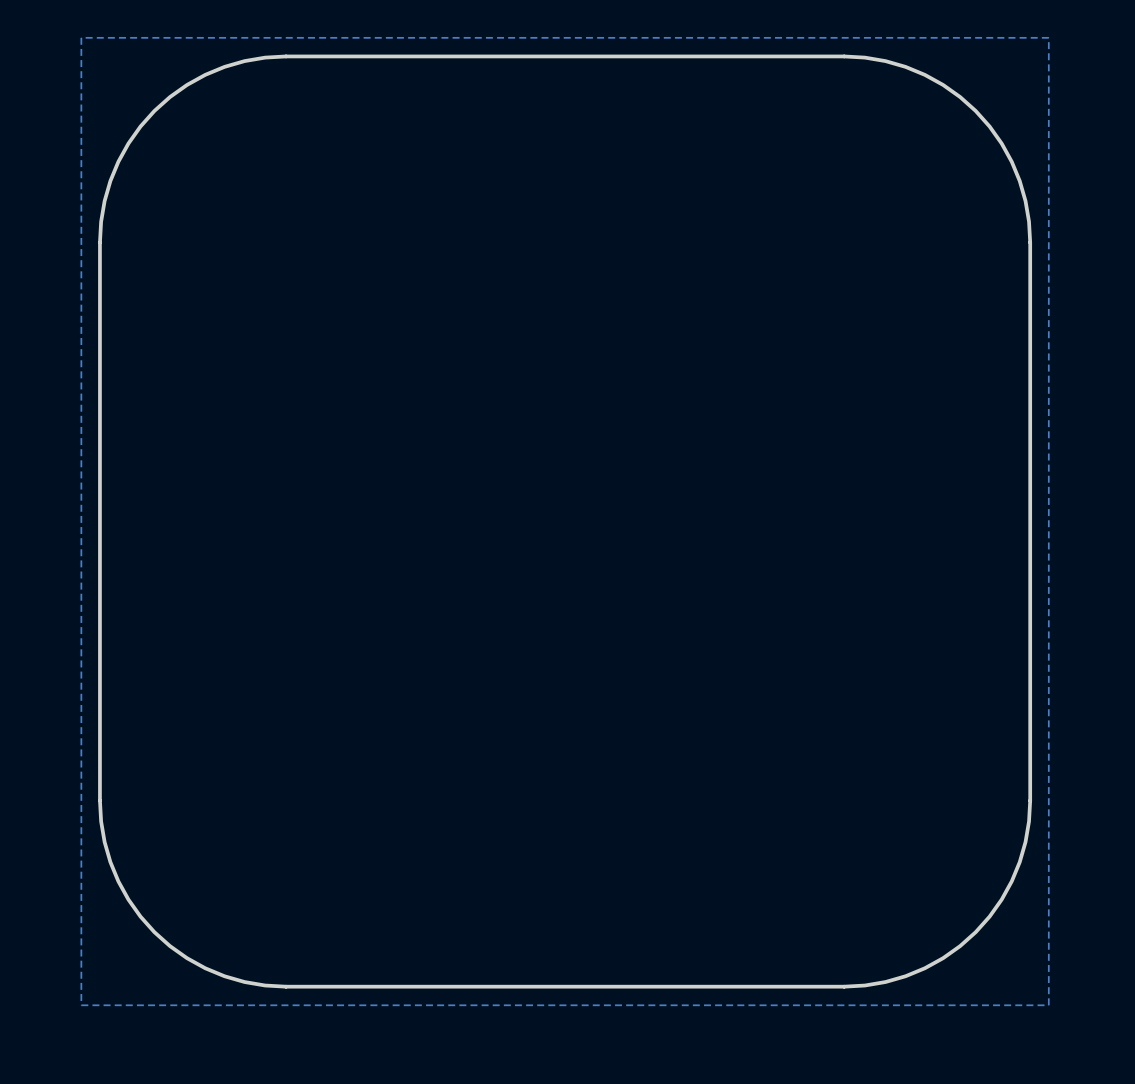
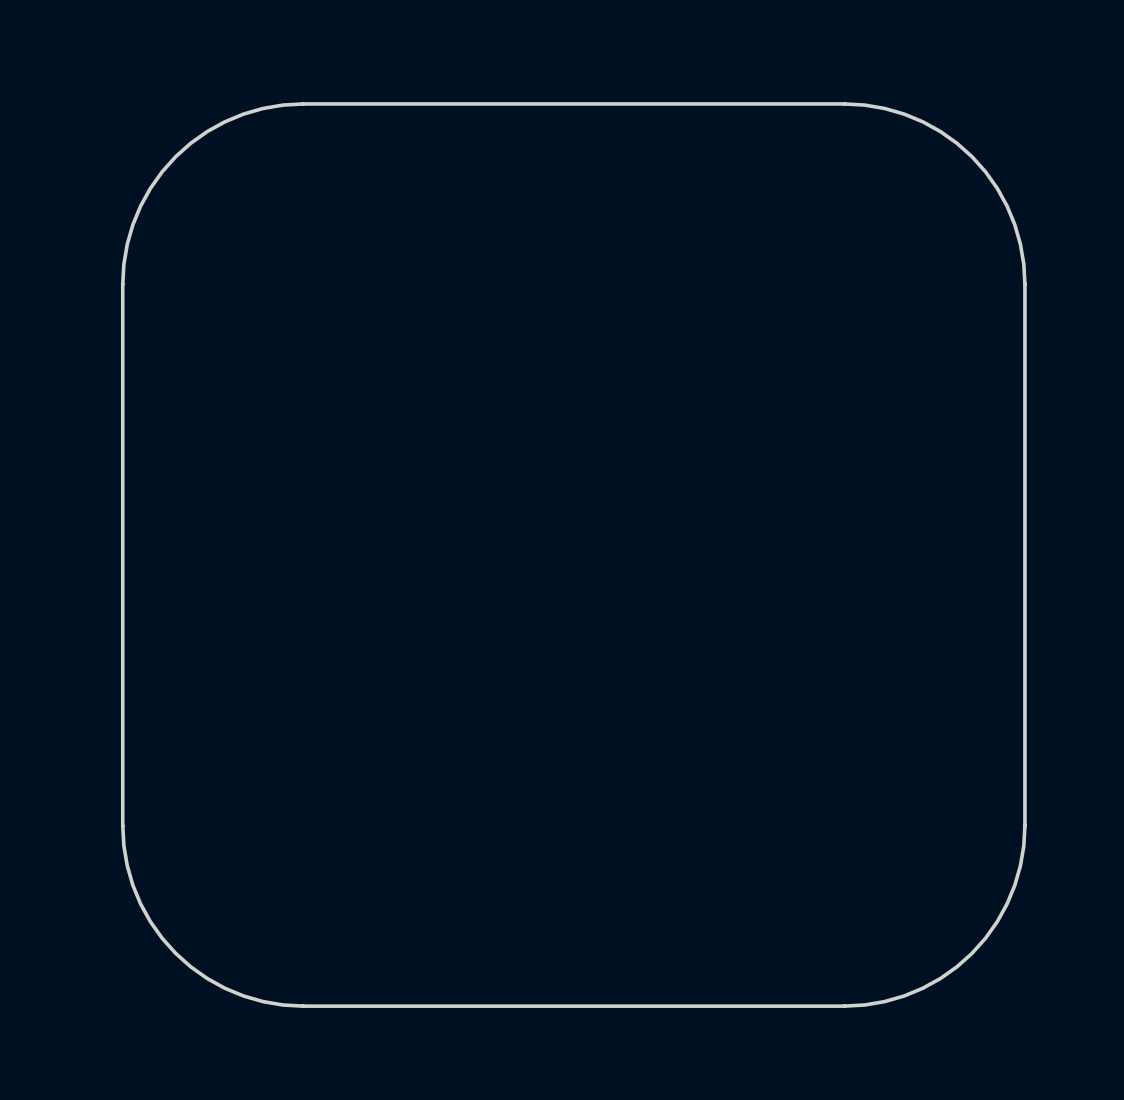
zone outline: (1048, 37) (1048, 1005) (81, 1005) (81, 37) (1048, 37) -> none

